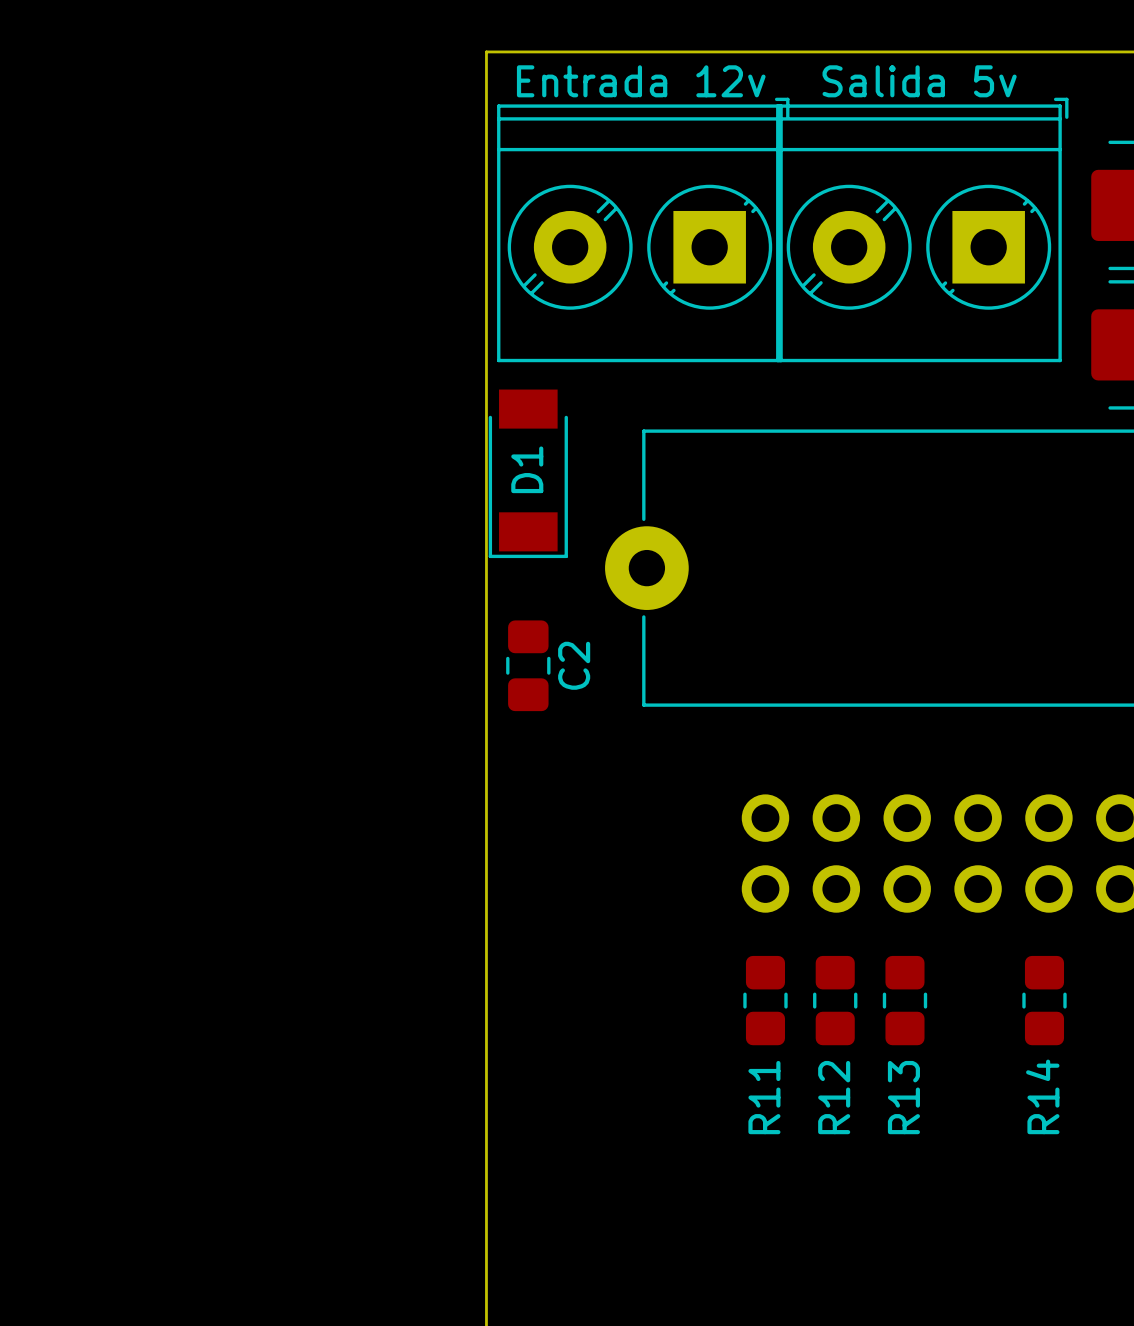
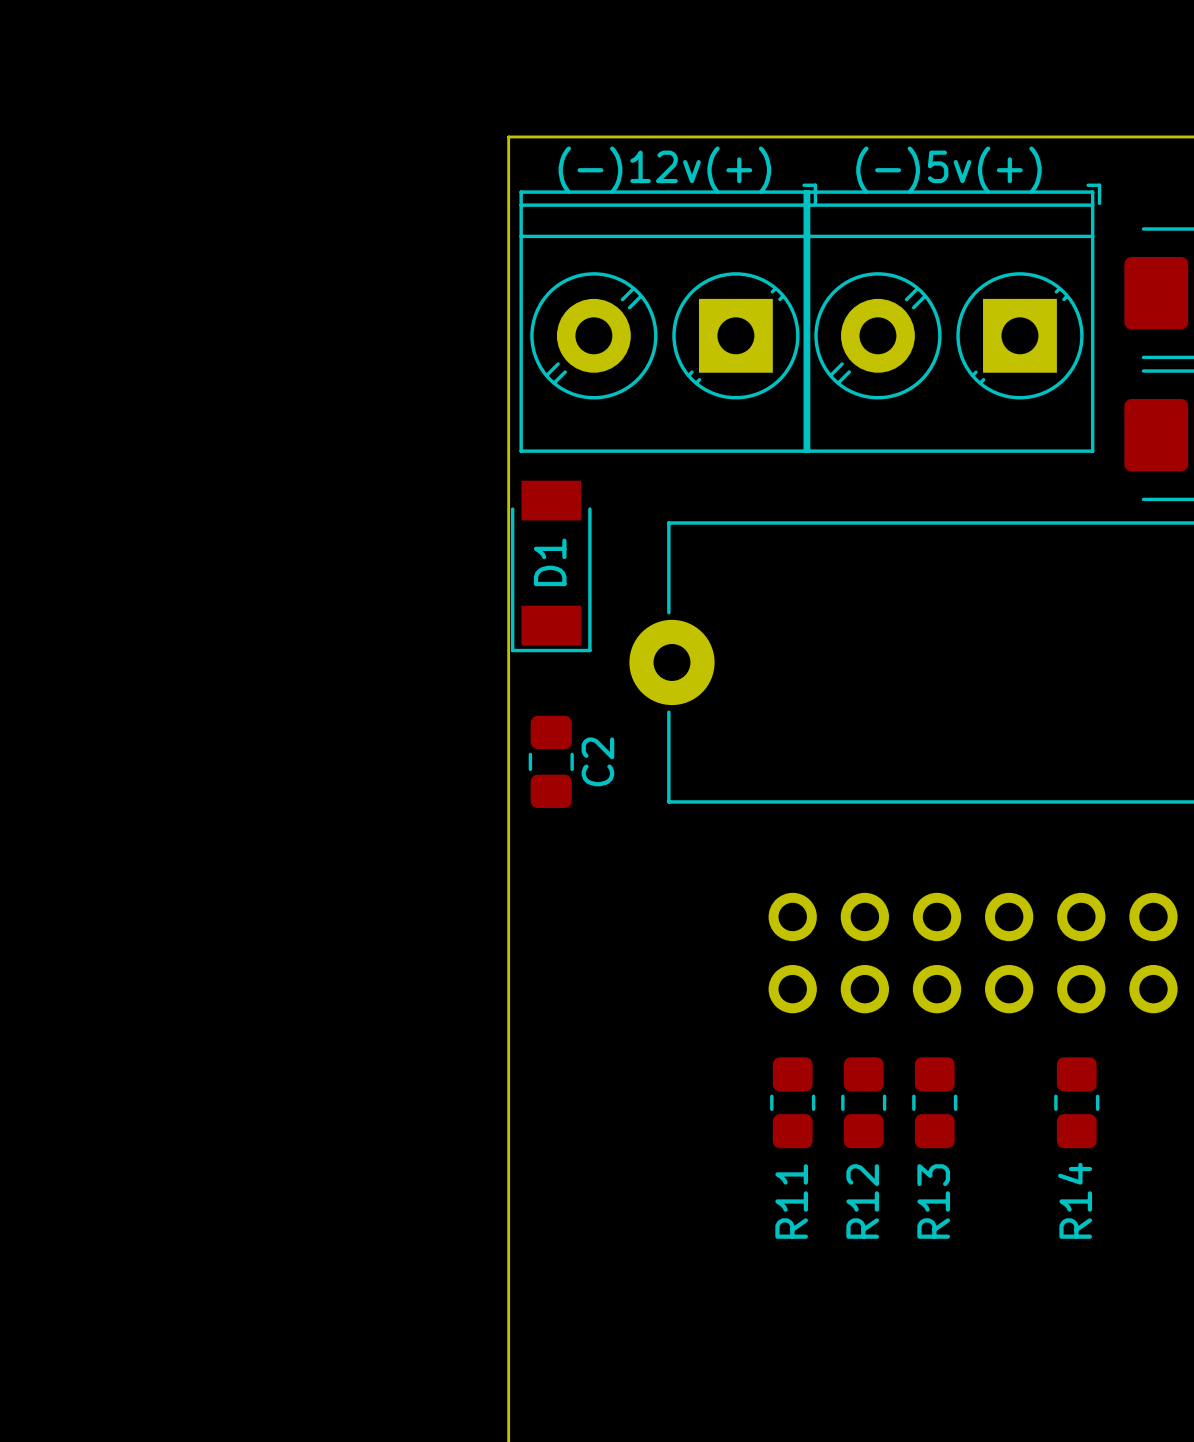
part value: Entrada 12v (641, 81) -> (-)12v(+) (664, 170)
part value: Salida 5v (919, 81) -> (-)5v(+) (948, 170)

